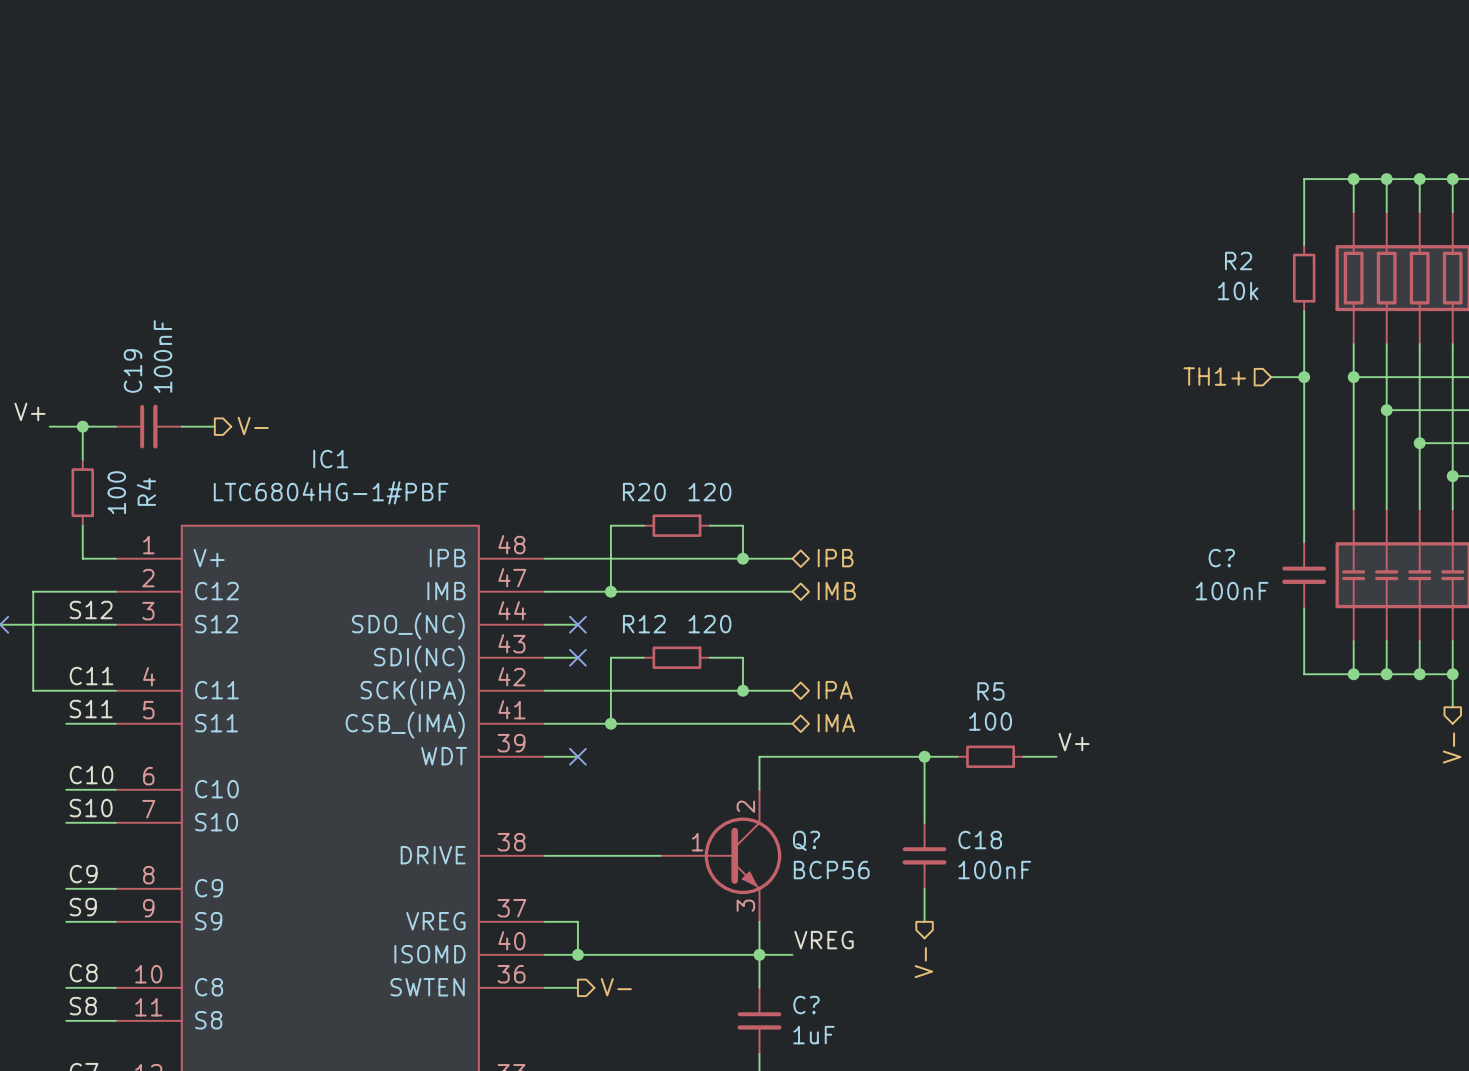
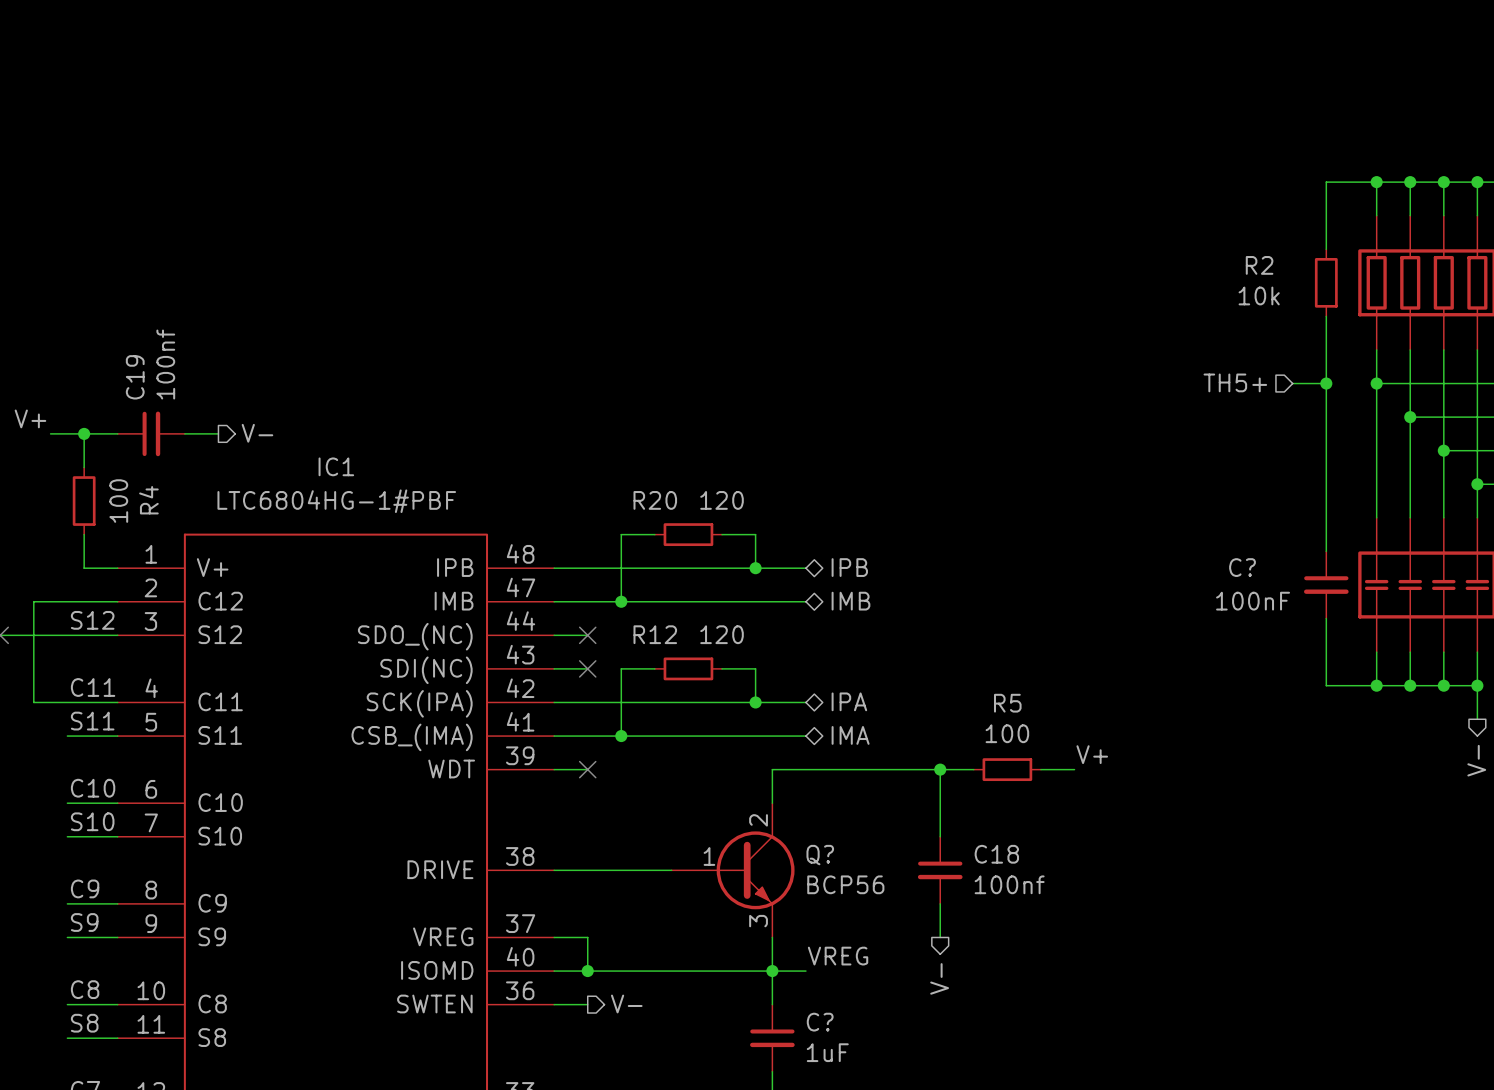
C19 value: 100nF (163, 356) -> 100nf (165, 364)
hierarchical label: TH1+ (1214, 376) -> TH5+ (1235, 382)
C18 value: 100nF (994, 870) -> 100nf (1009, 884)

